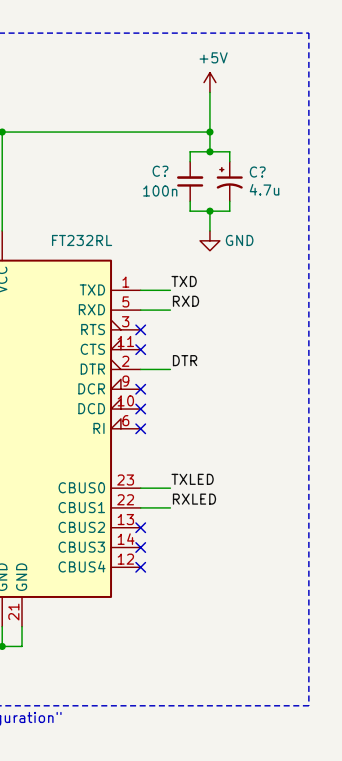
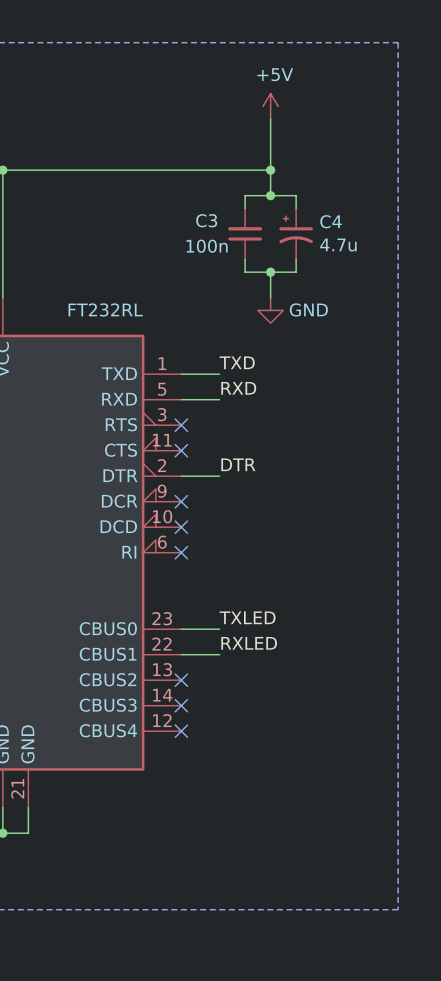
C? name: C? (160, 171) -> C3 (206, 220)
C? name: C? (257, 172) -> C4 (331, 221)

